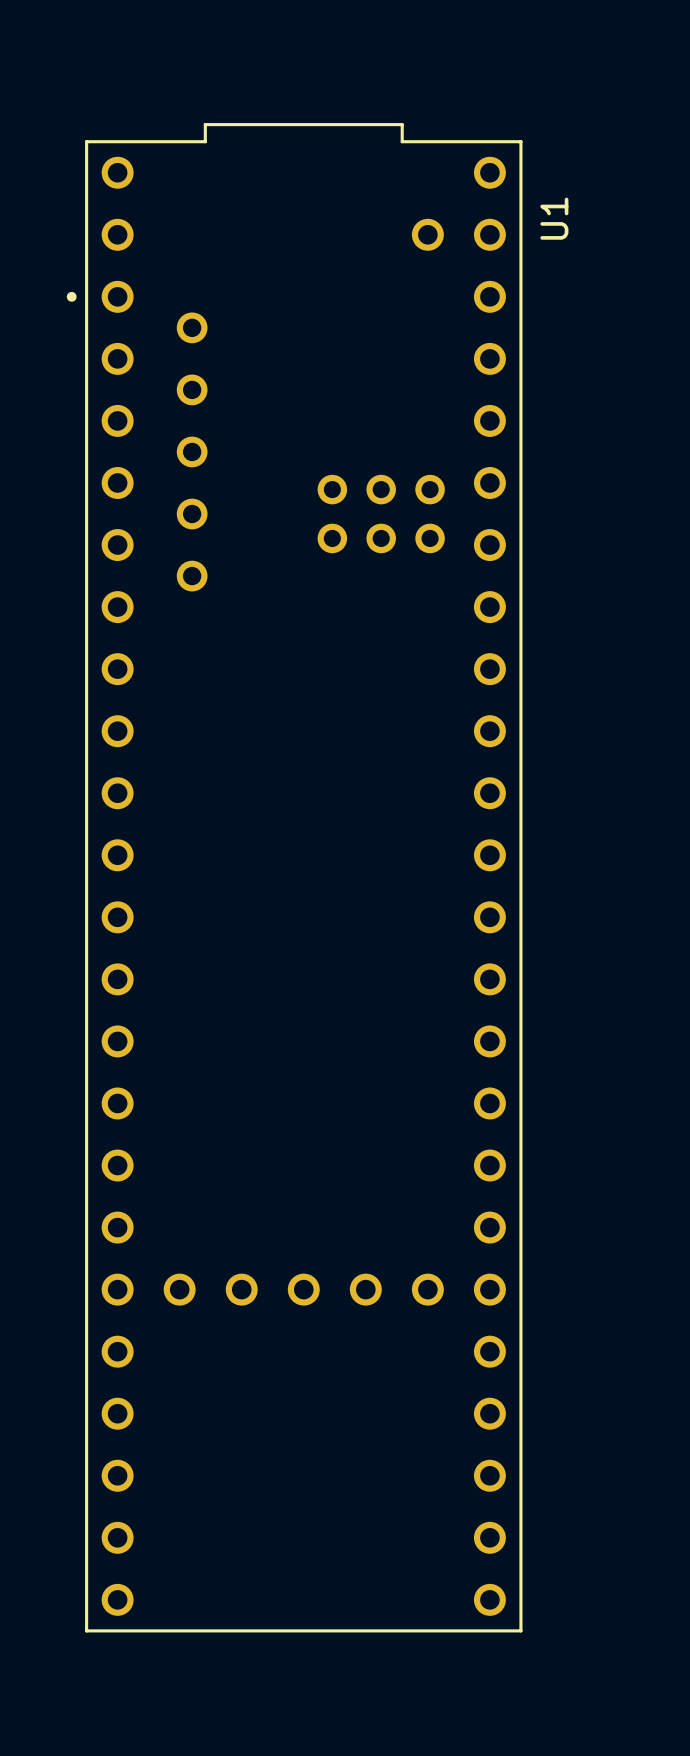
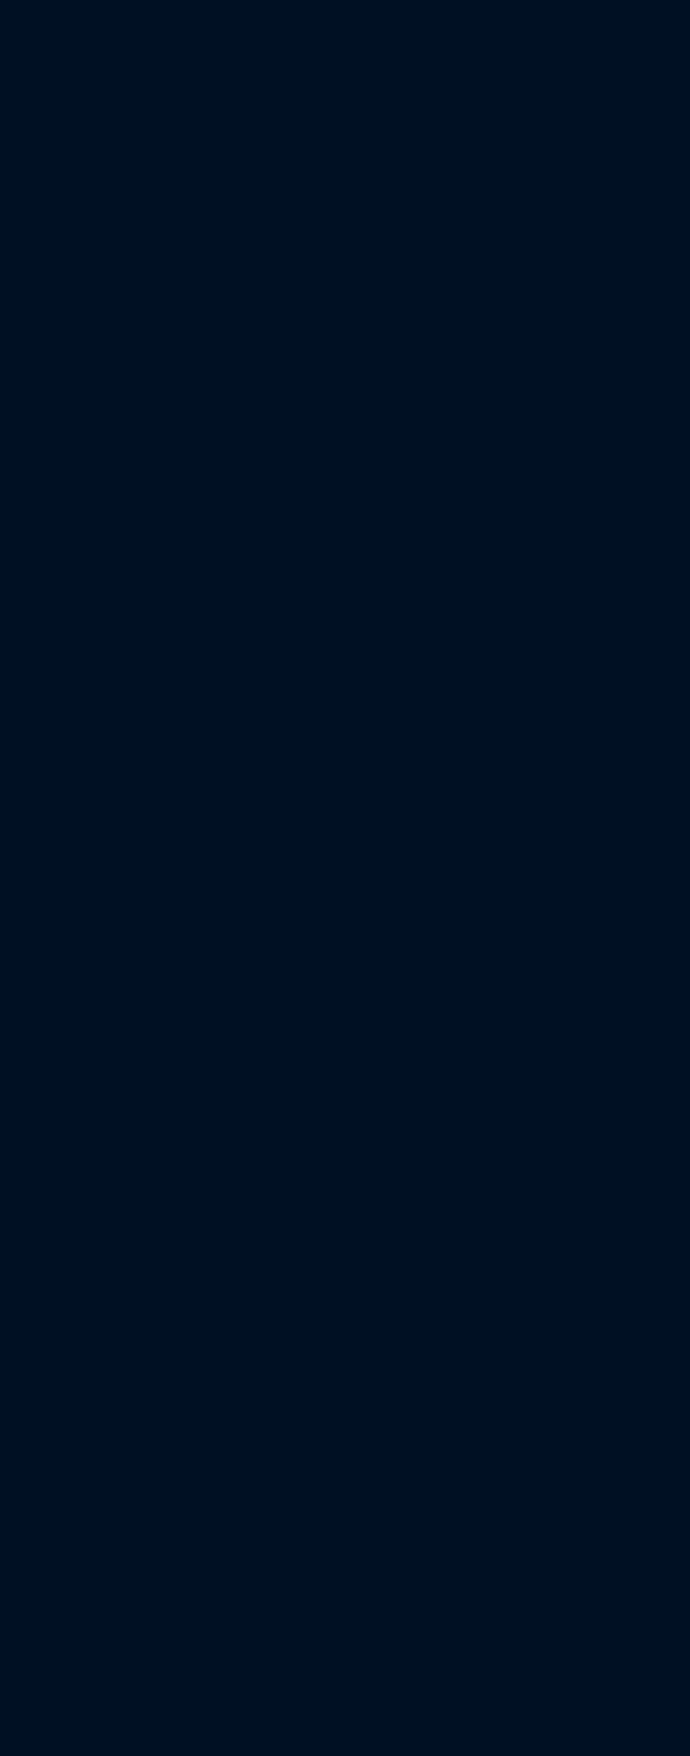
U1: (294, 877) -> none

